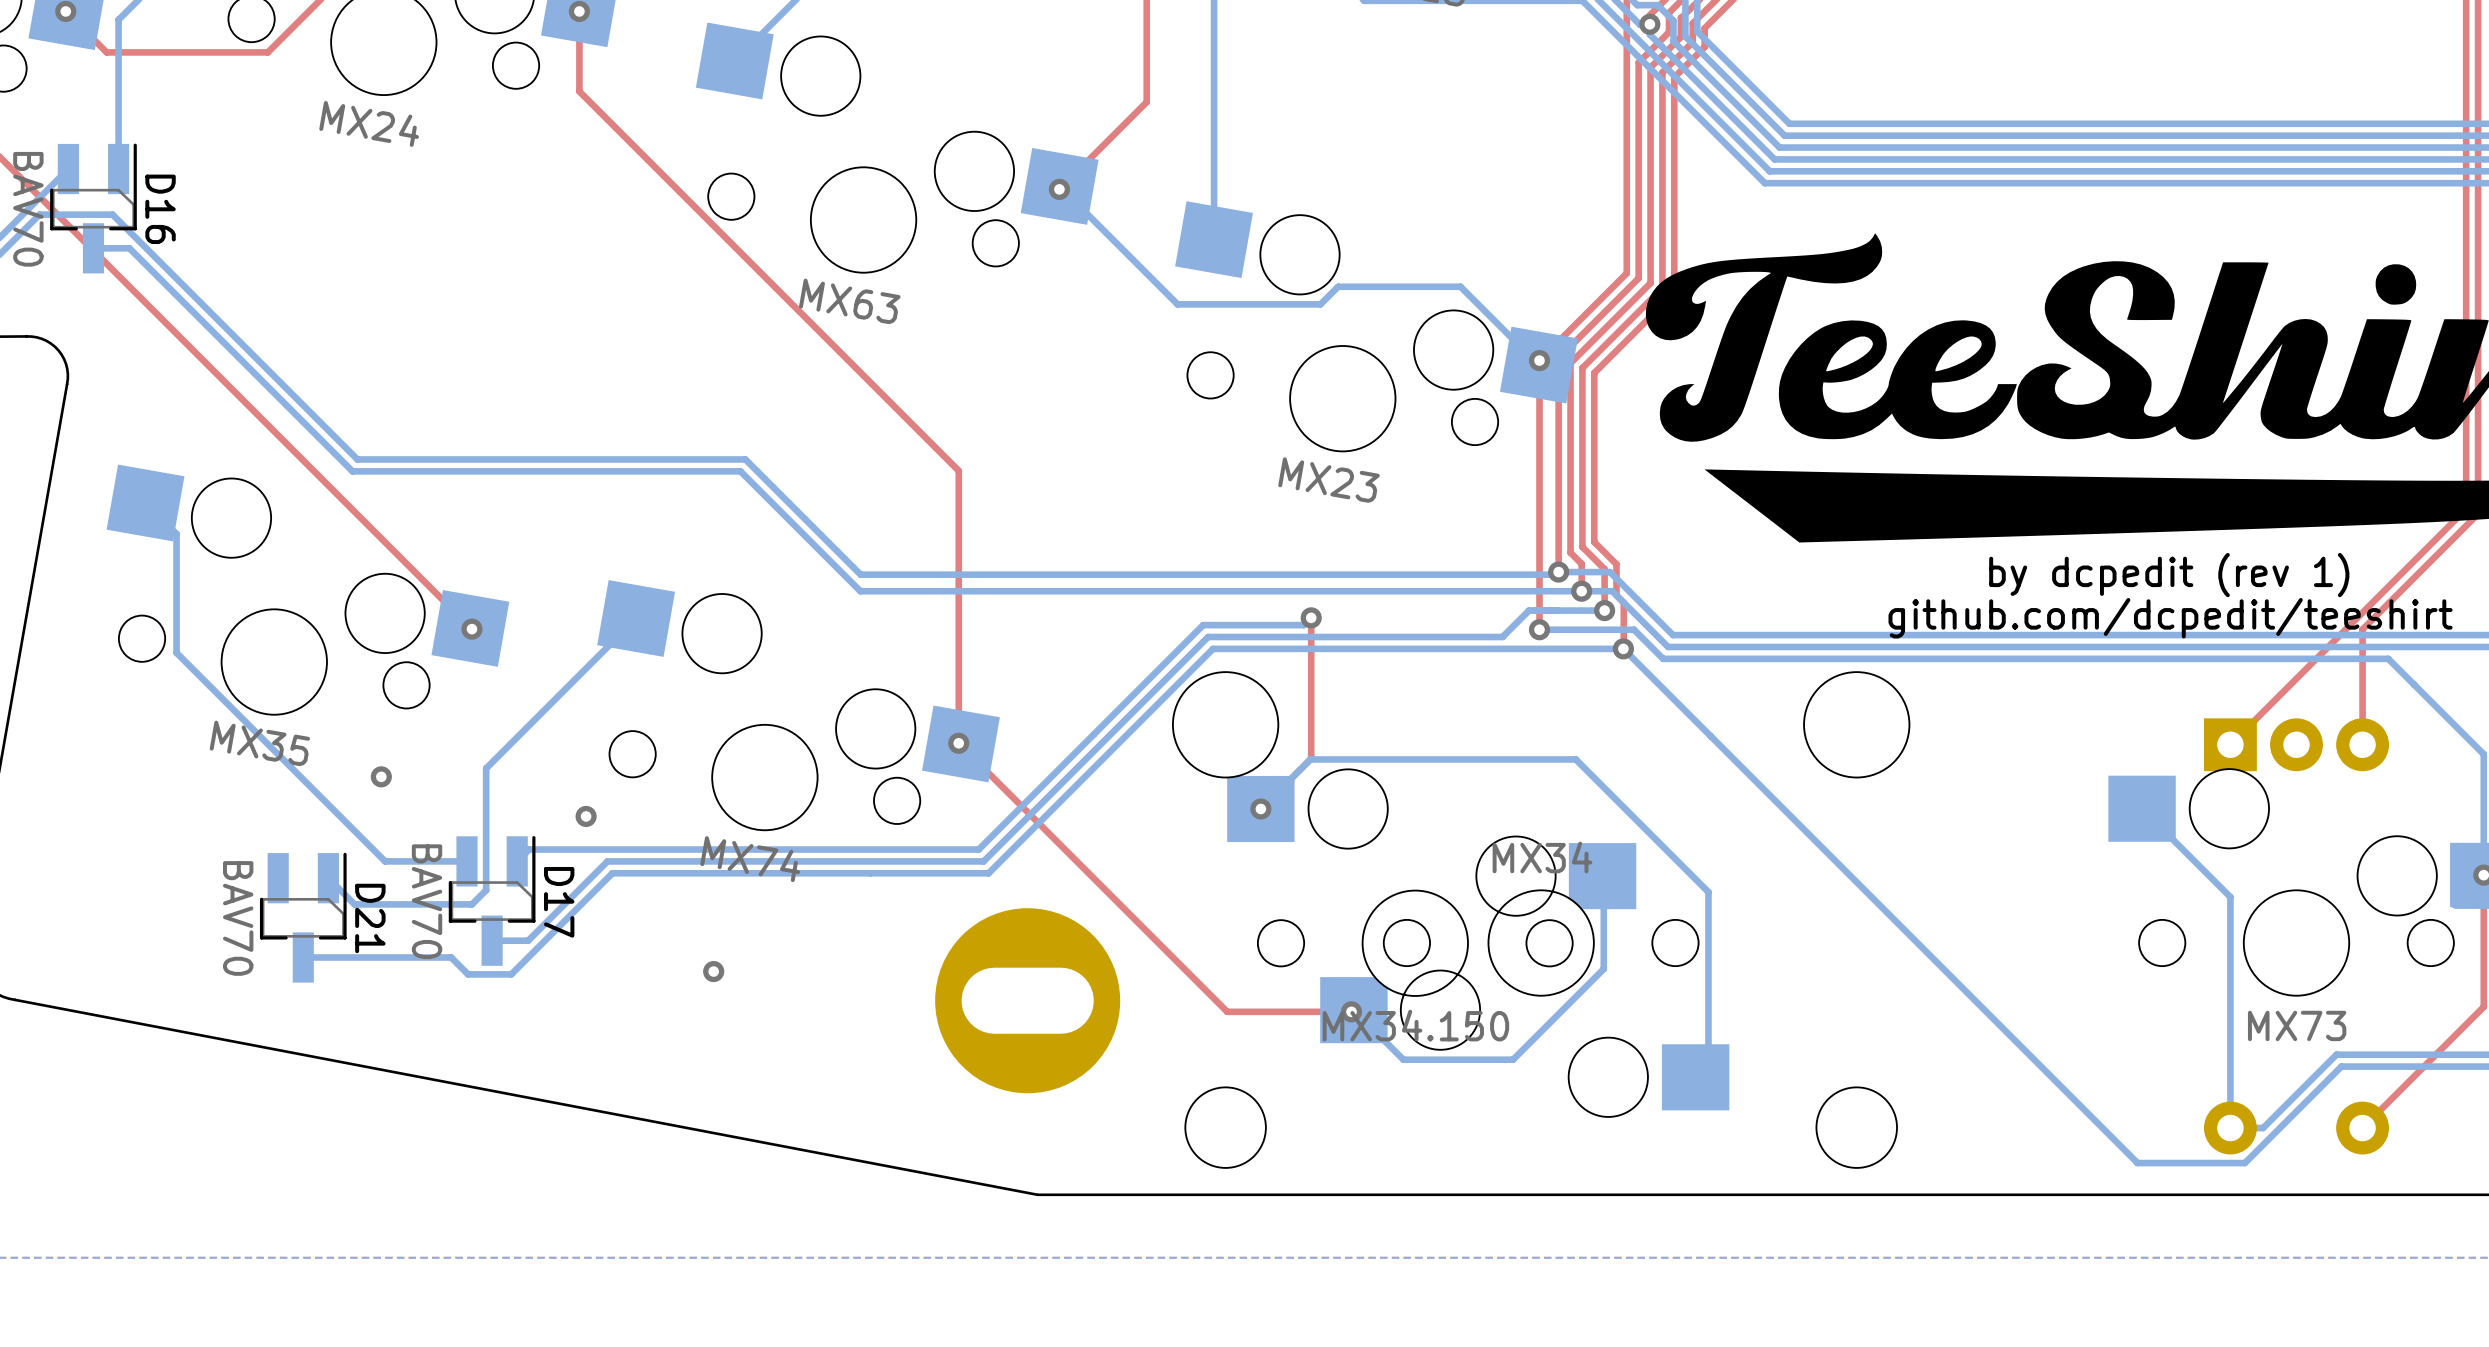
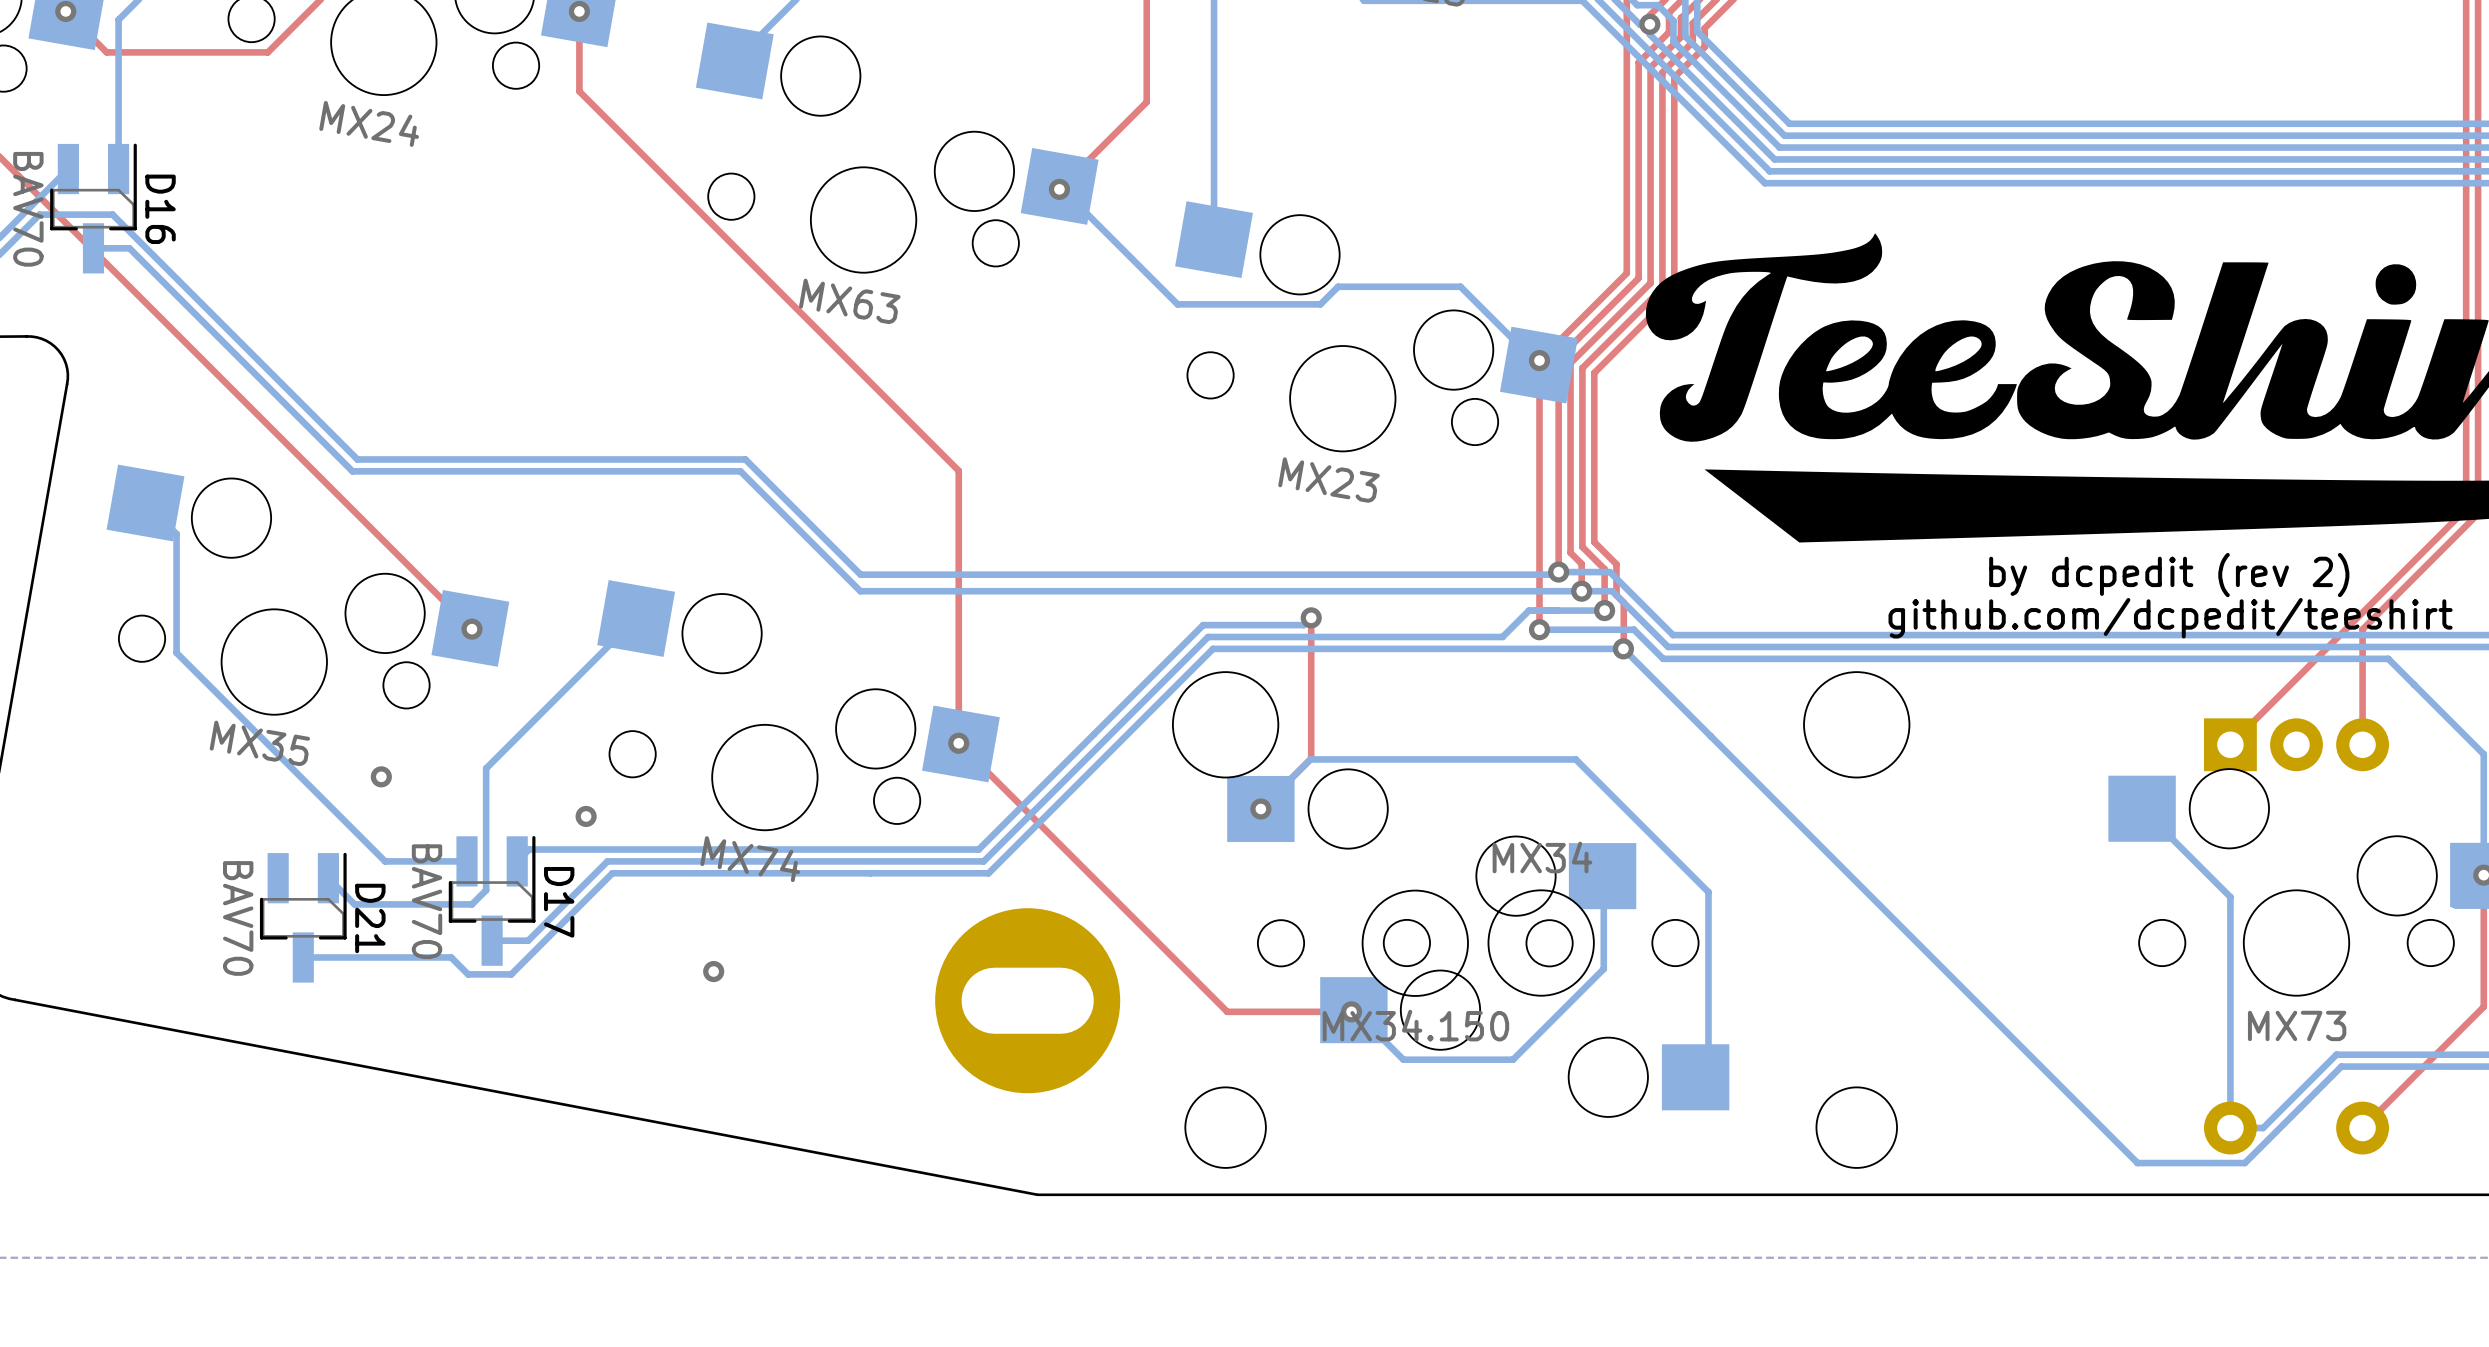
text: by dcpedit (rev 1) (2169, 575) -> by dcpedit (rev 2) (2169, 575)

